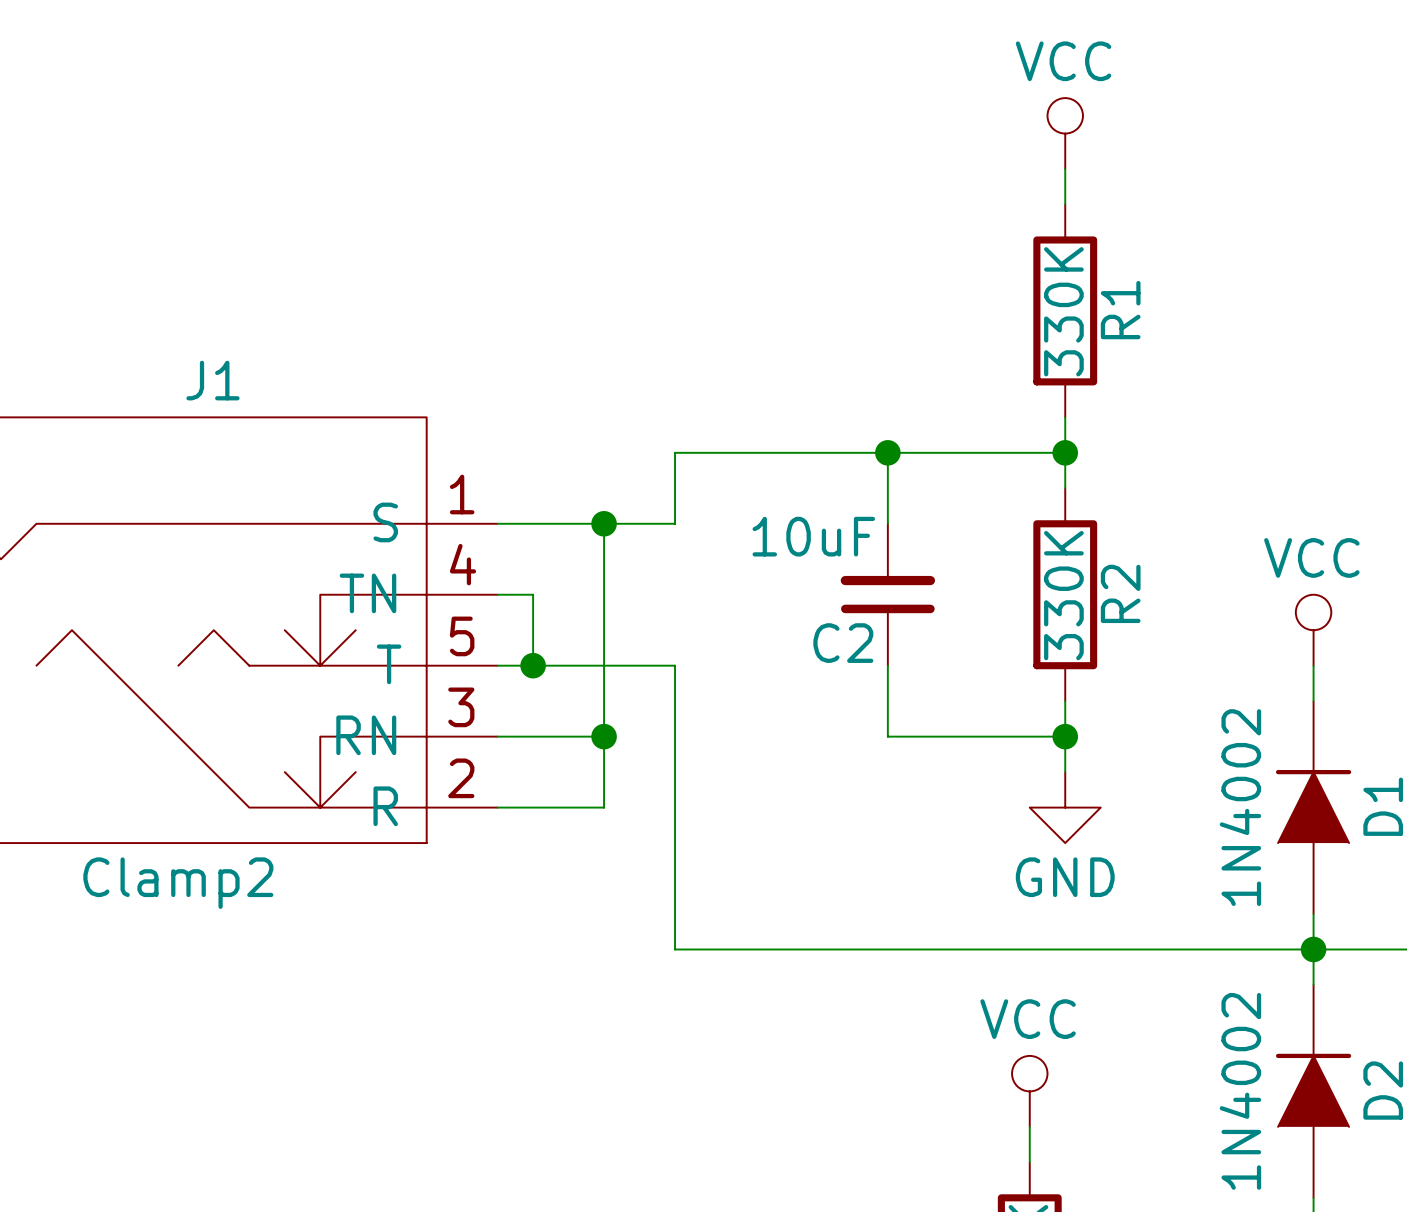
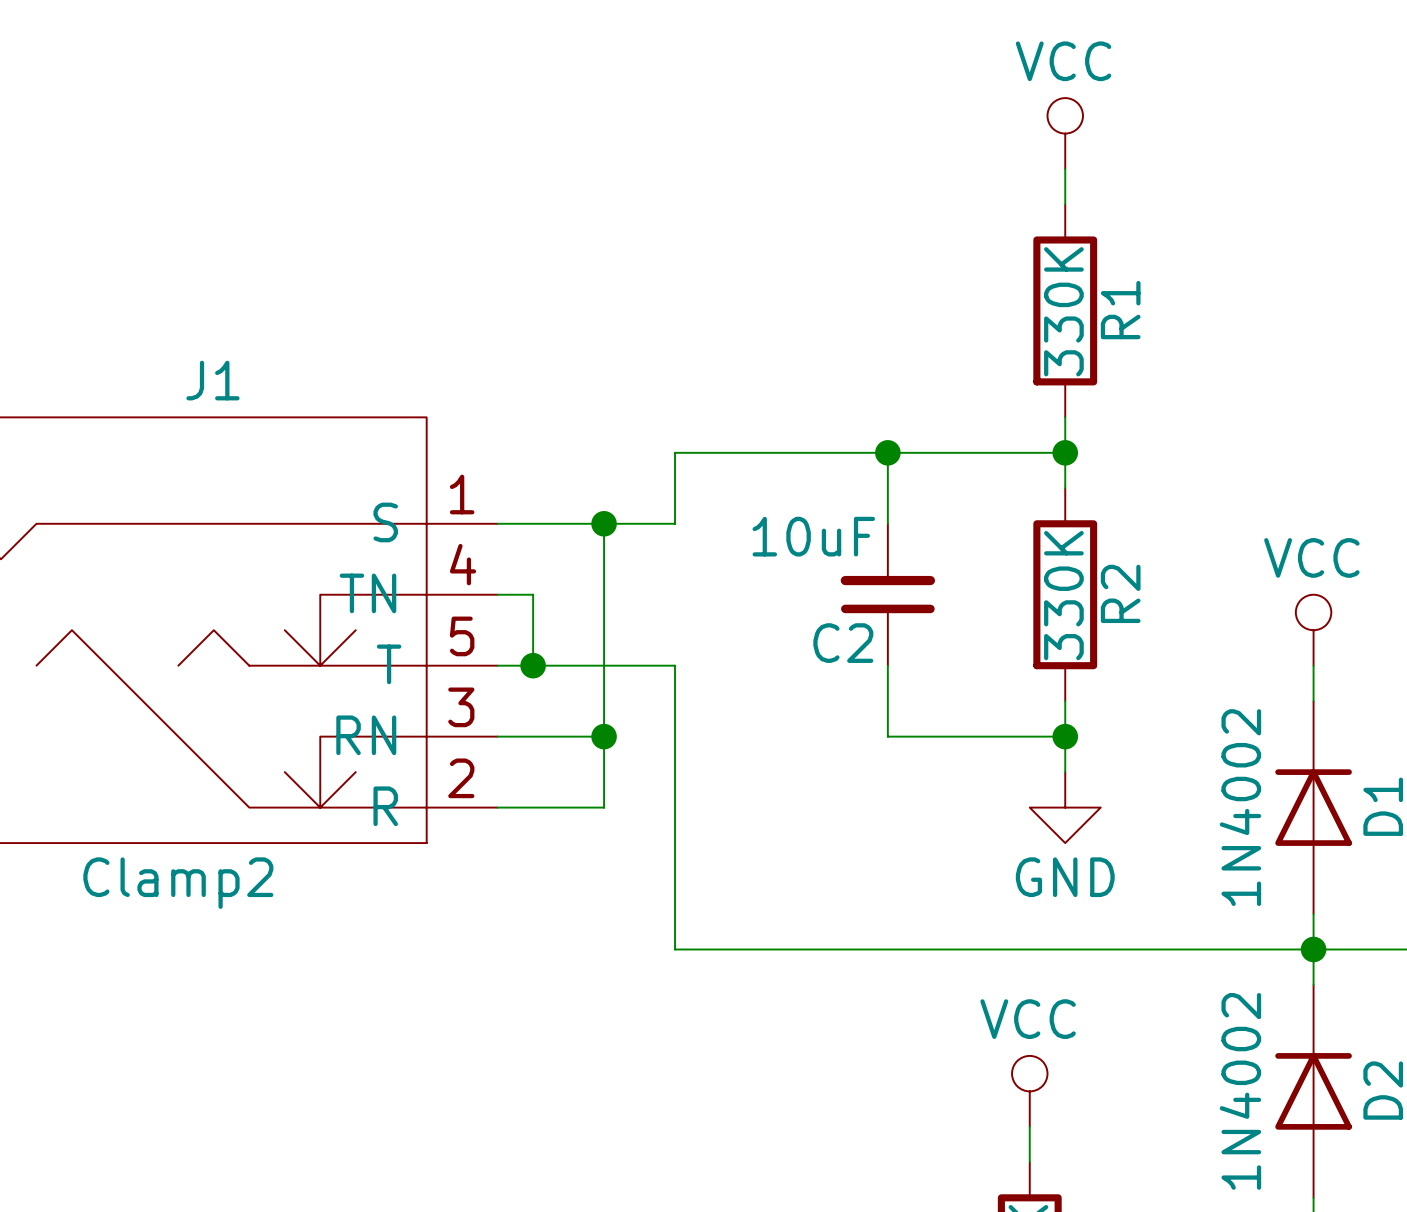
D1 symbol: [1275, 701, 1352, 915] -> [1275, 701, 1352, 915]
D2 symbol: [1275, 984, 1352, 1198] -> [1275, 984, 1352, 1198]

